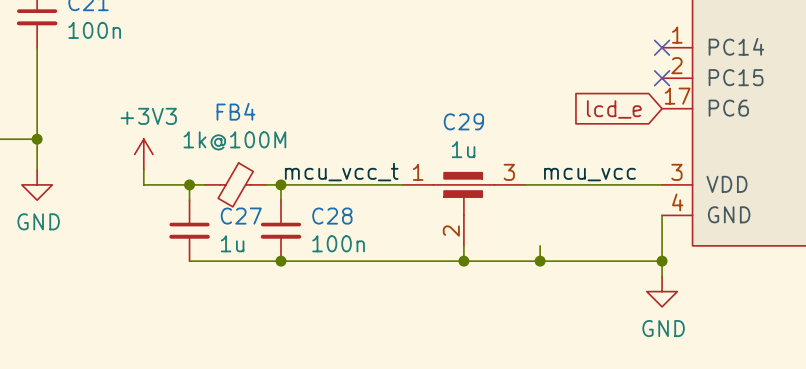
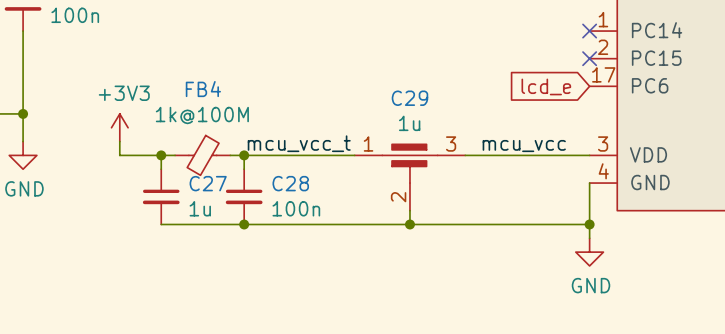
wire: (540, 245) (540, 261) -> none
junction: (540, 261) -> none

